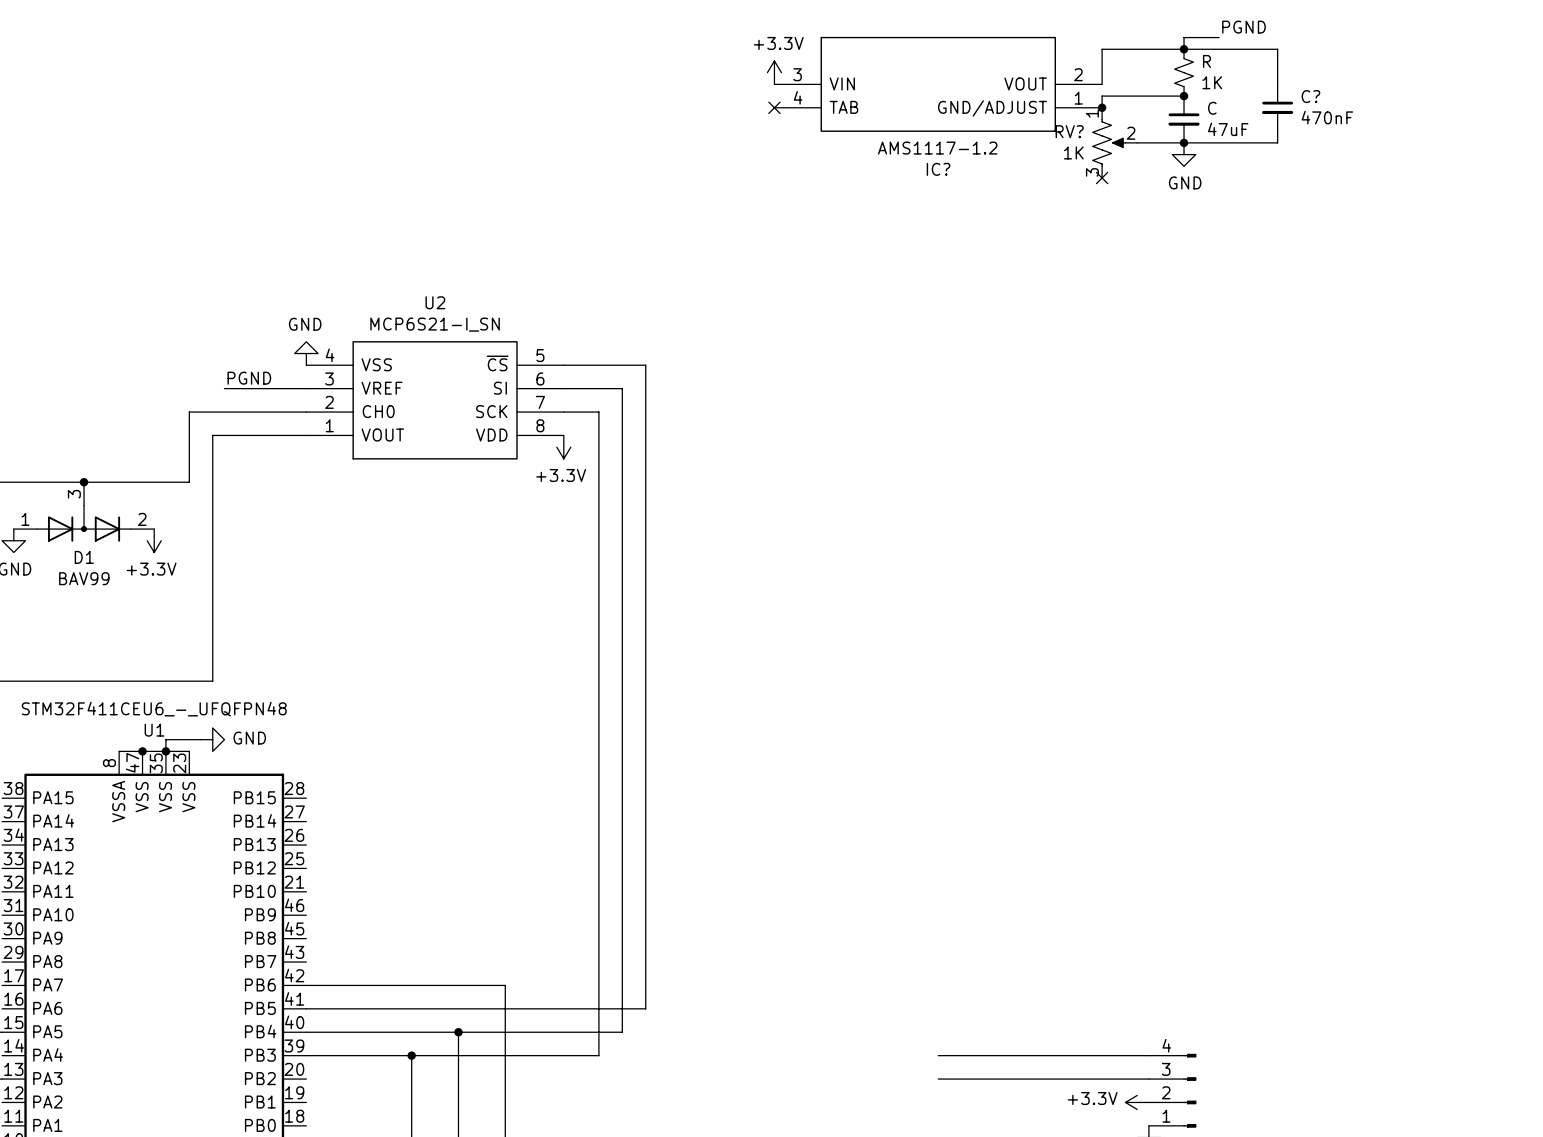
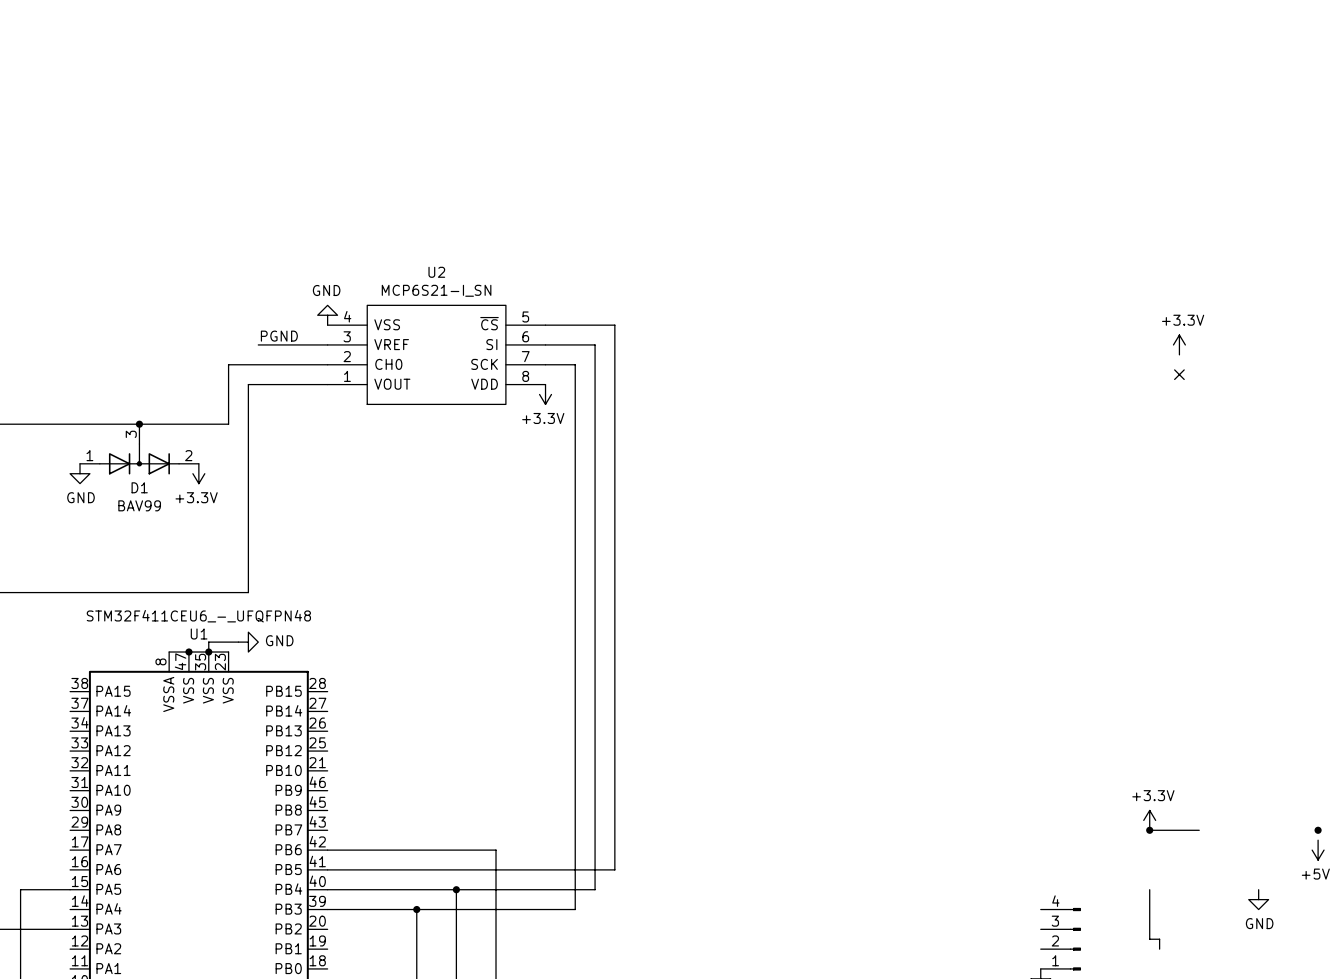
label: PGND (1244, 27) -> none
wire: (1219, 37) (1184, 37) (1184, 49) -> none
junction: (1184, 49) -> none
power symbol: +3.3V (774, 72) -> none
R: 1K (1184, 72) -> none
IC?: AMS1117-1.2 (938, 84) -> none
wire: (1102, 84) (1102, 49) (1277, 49) (1277, 84) -> none
wire: (1184, 96) (1102, 96) (1102, 107) -> none
junction: (1184, 96) -> none
no-connect mark: (774, 107) -> none
junction: (1102, 107) -> none
C?: 470nF (1277, 107) -> none
C: 47uF (1184, 119) -> none
wire: (1277, 131) (1277, 142) (1137, 142) -> none
RV?: 1K (1114, 142) -> none
junction: (1184, 142) -> none
power symbol: GND (1184, 154) -> none
no-connect mark: (1102, 177) -> none
power symbol: none -> +3.3V (1179, 344)
no-connect mark: none -> (1179, 374)
power symbol: none -> +3.3V (1149, 820)
wire: none -> (1149, 830) (1199, 830)
junction: none -> (1149, 830)
junction: none -> (1318, 830)
power symbol: none -> +5V (1318, 850)
wire: none -> (1149, 889) (1149, 939) (1159, 939) (1159, 949)
power symbol: none -> GND (1258, 899)
wire: (938, 1055) (1148, 1055) -> none
wire: (938, 1079) (1148, 1079) -> none
power symbol: +3.3V (1137, 1102) -> none

